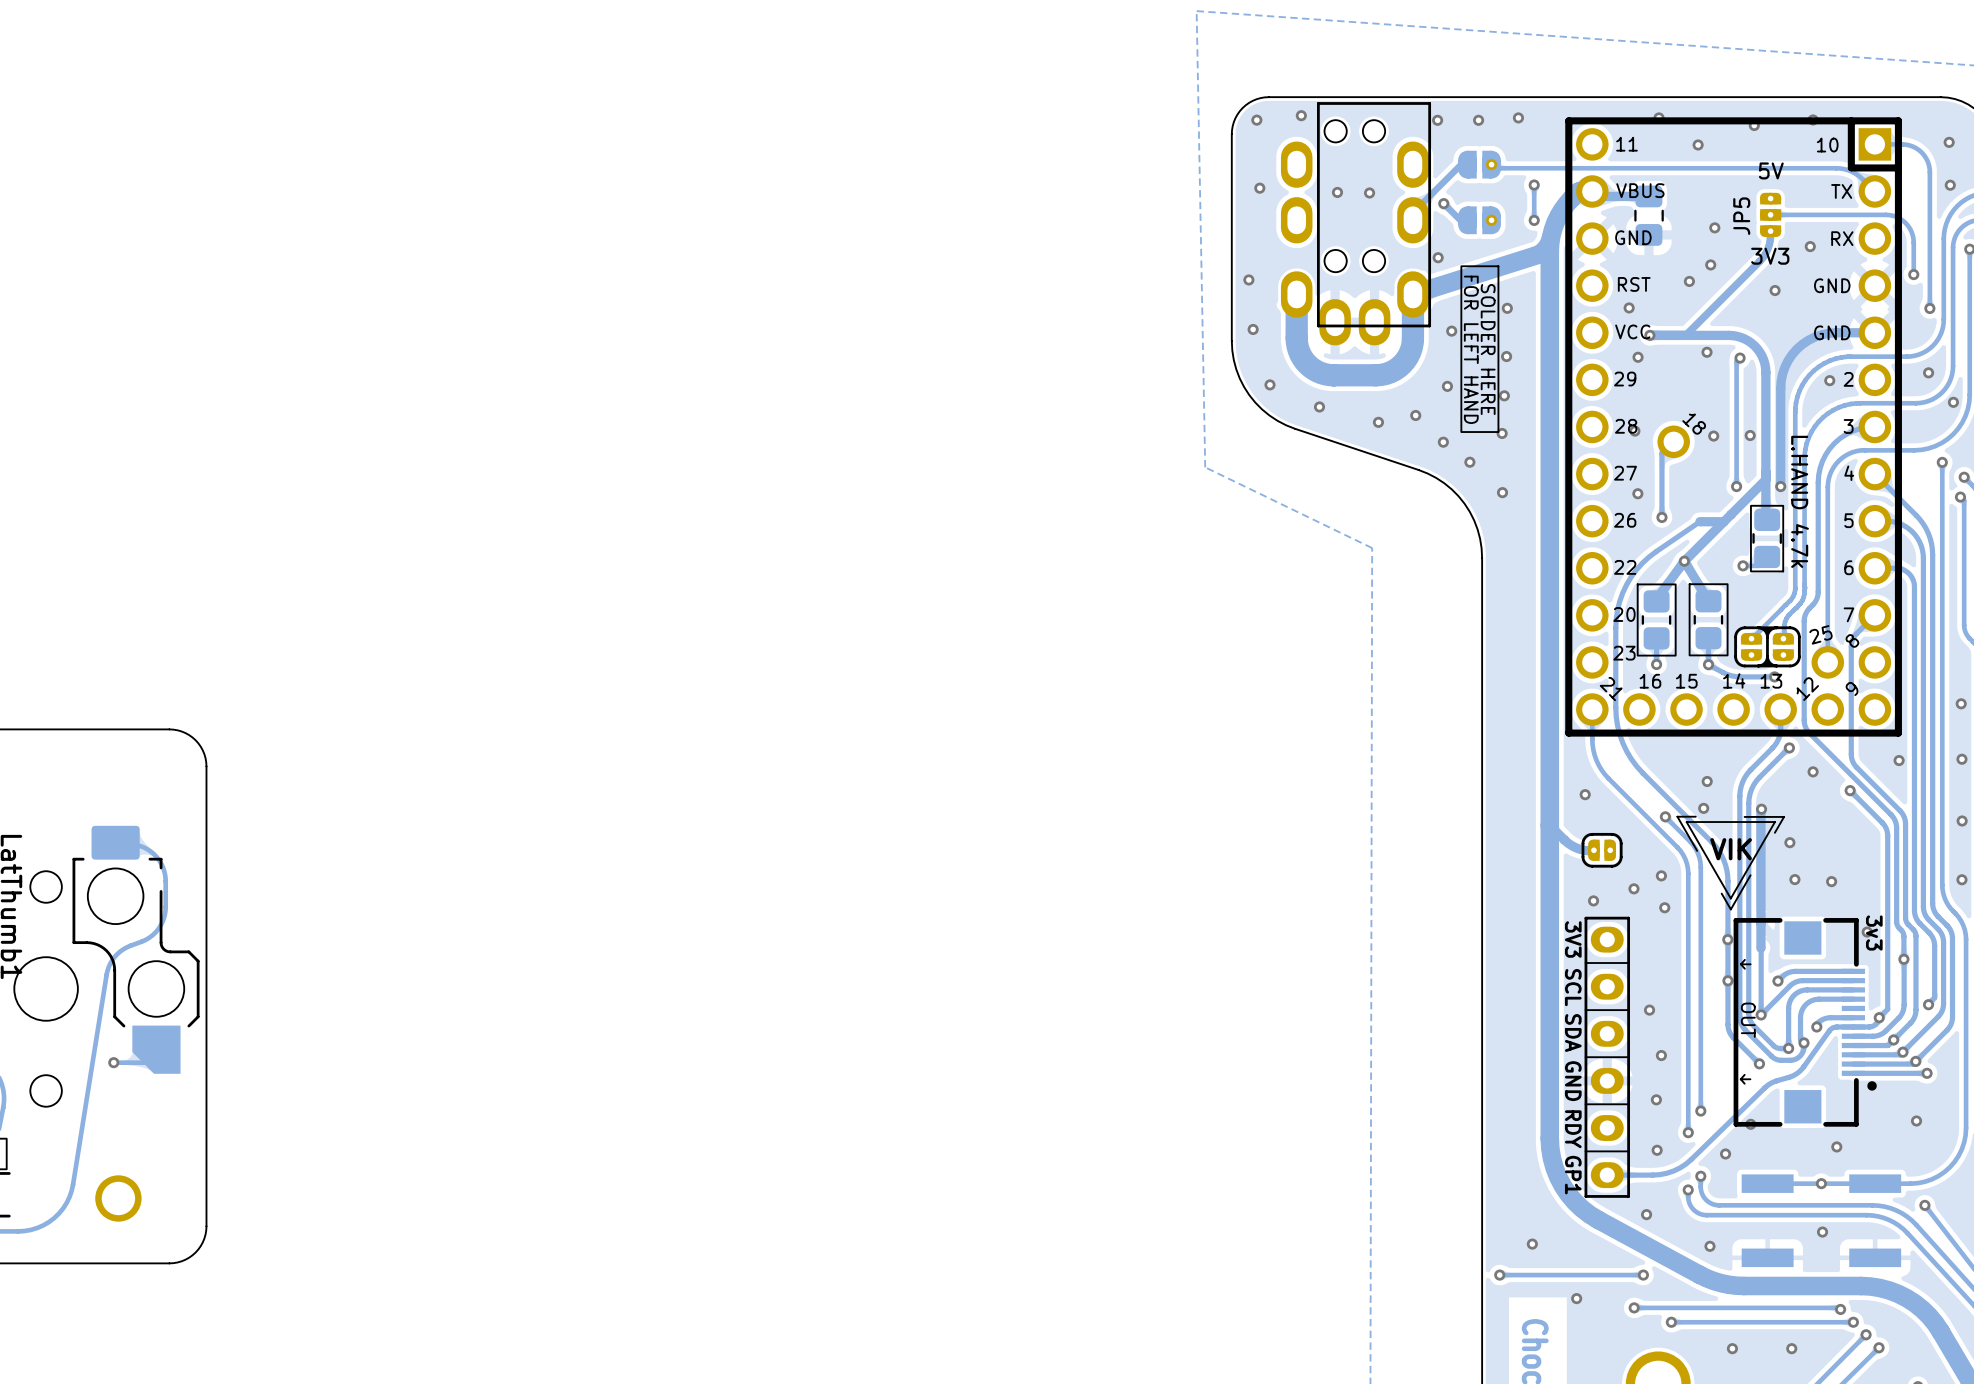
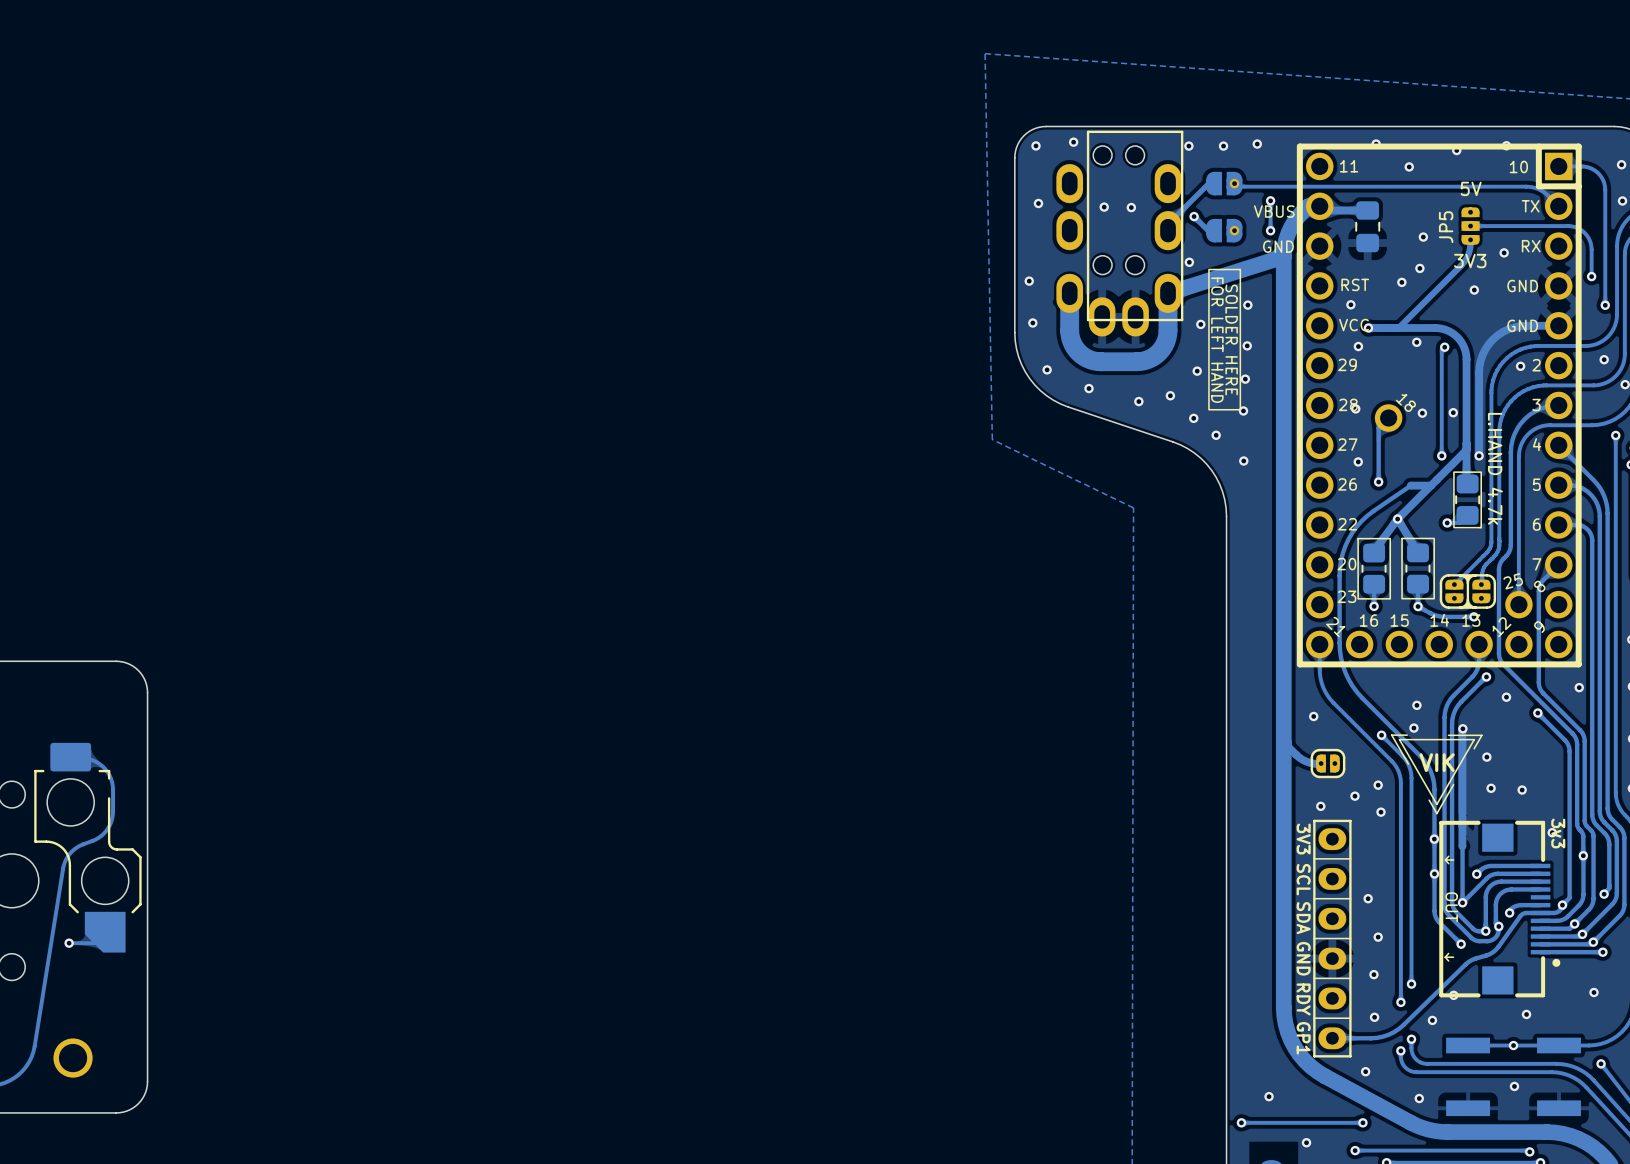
part text position: VBUS (1640, 190) -> VBUS (1274, 211)
part text position: GND (1633, 237) -> GND (1278, 246)

